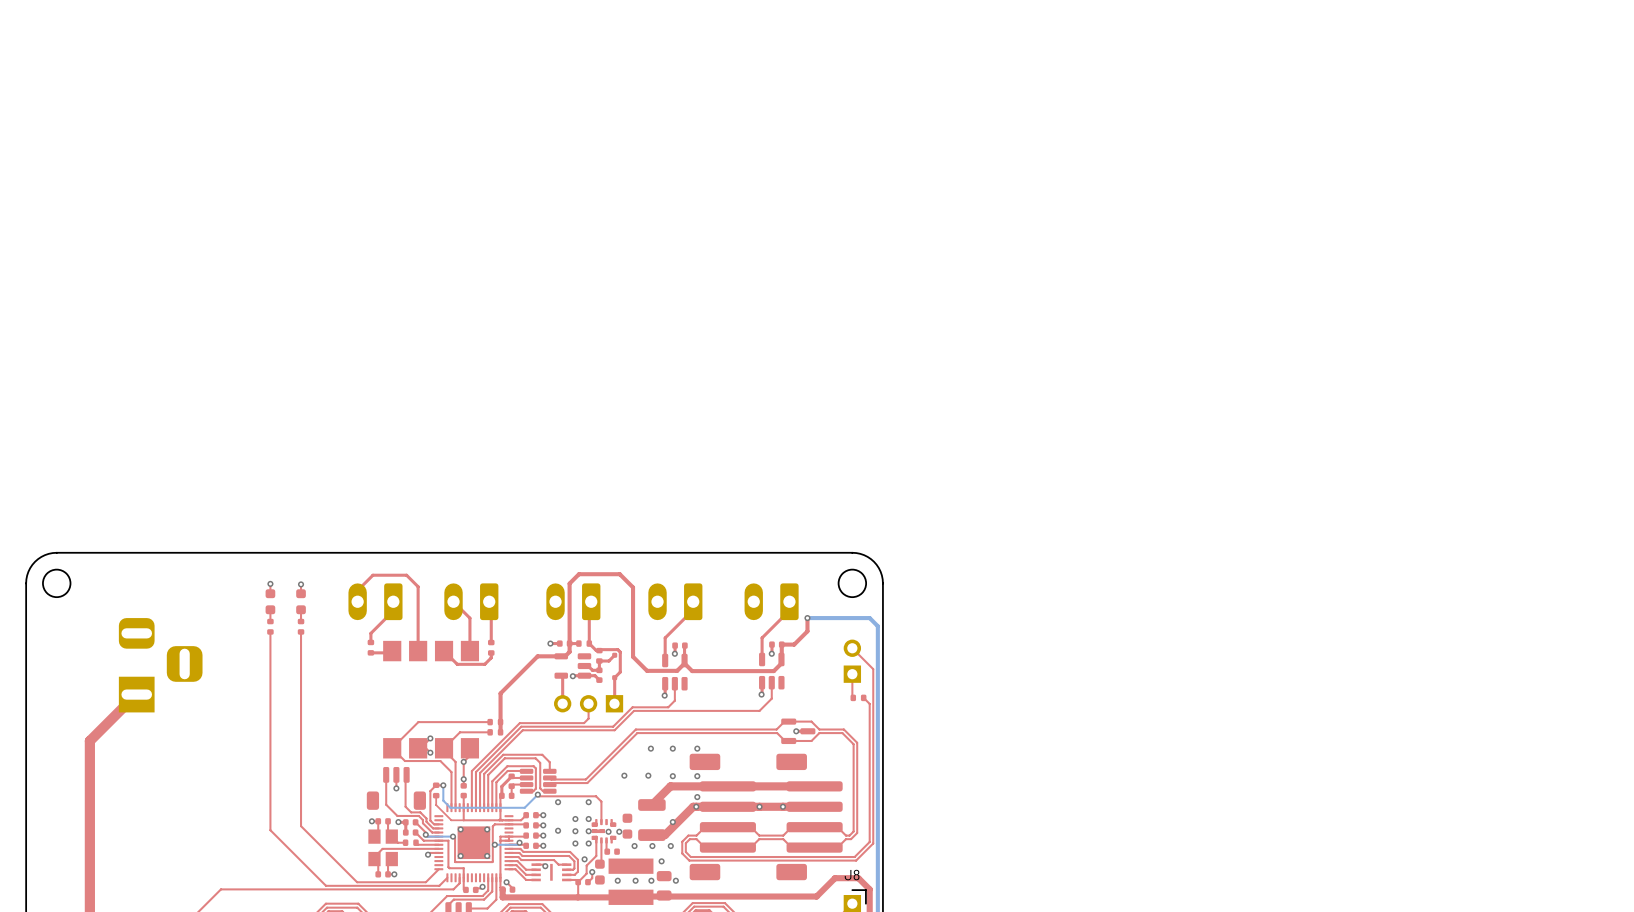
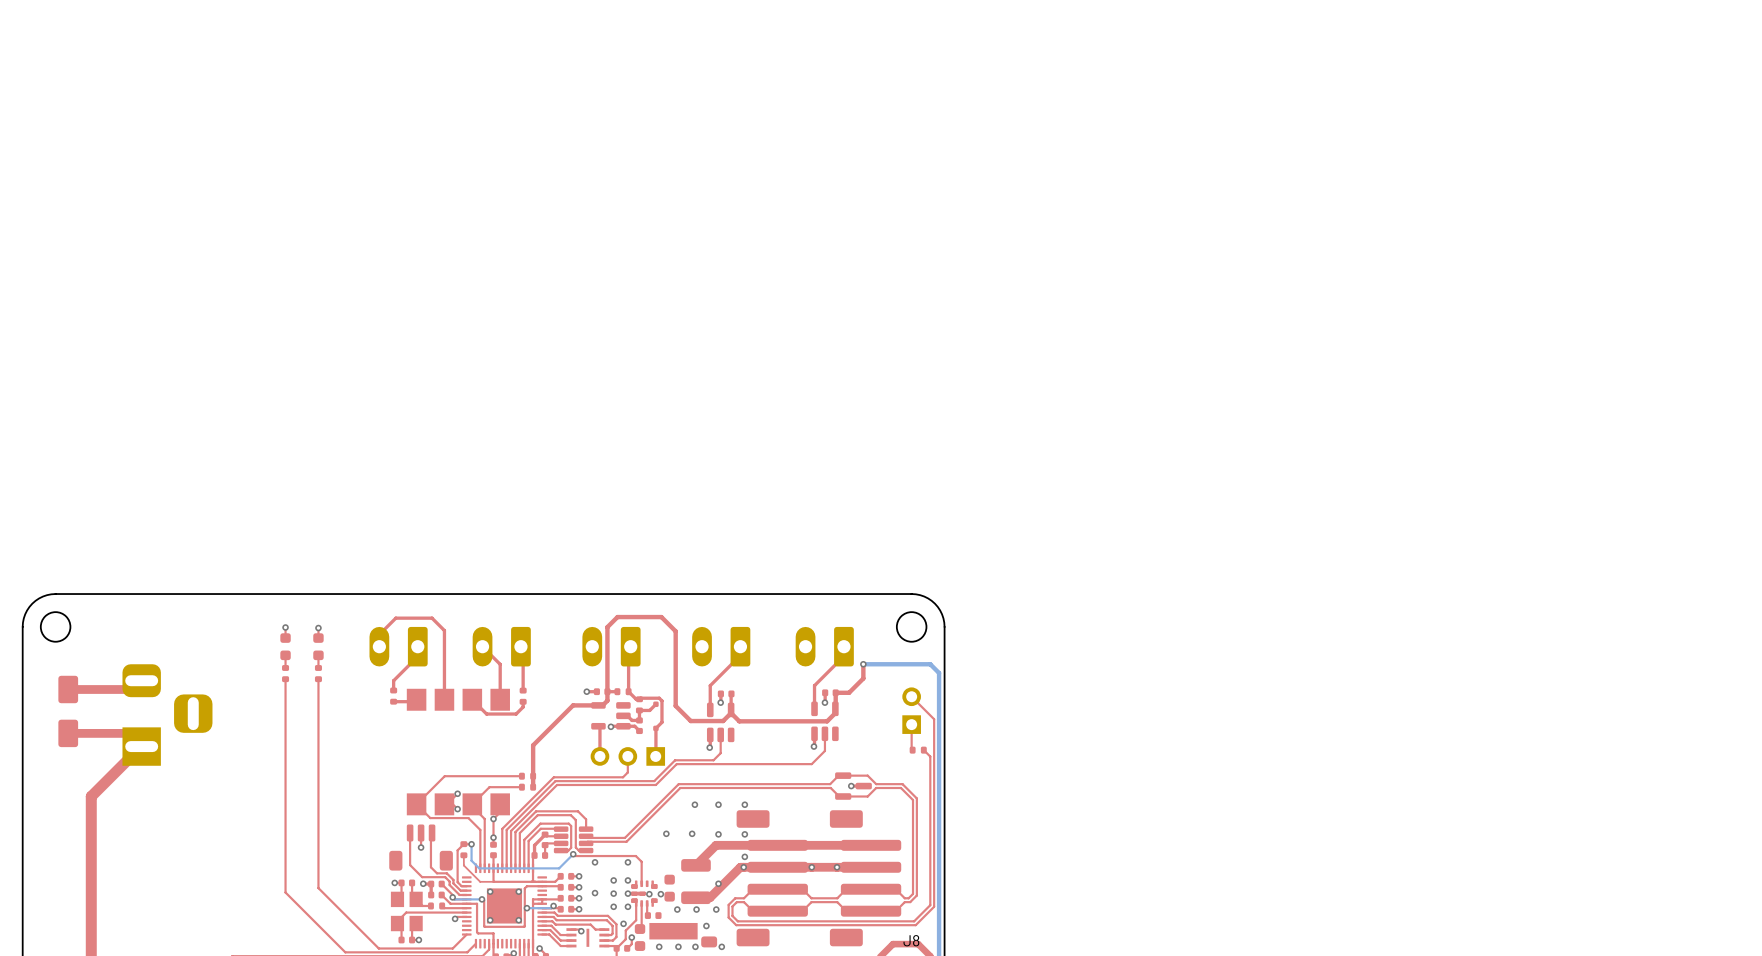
top track: none -> (141, 680) (132, 689) (68, 689)
part: none -> (68, 711)
top track: none -> (68, 733) (128, 733) (141, 746)

